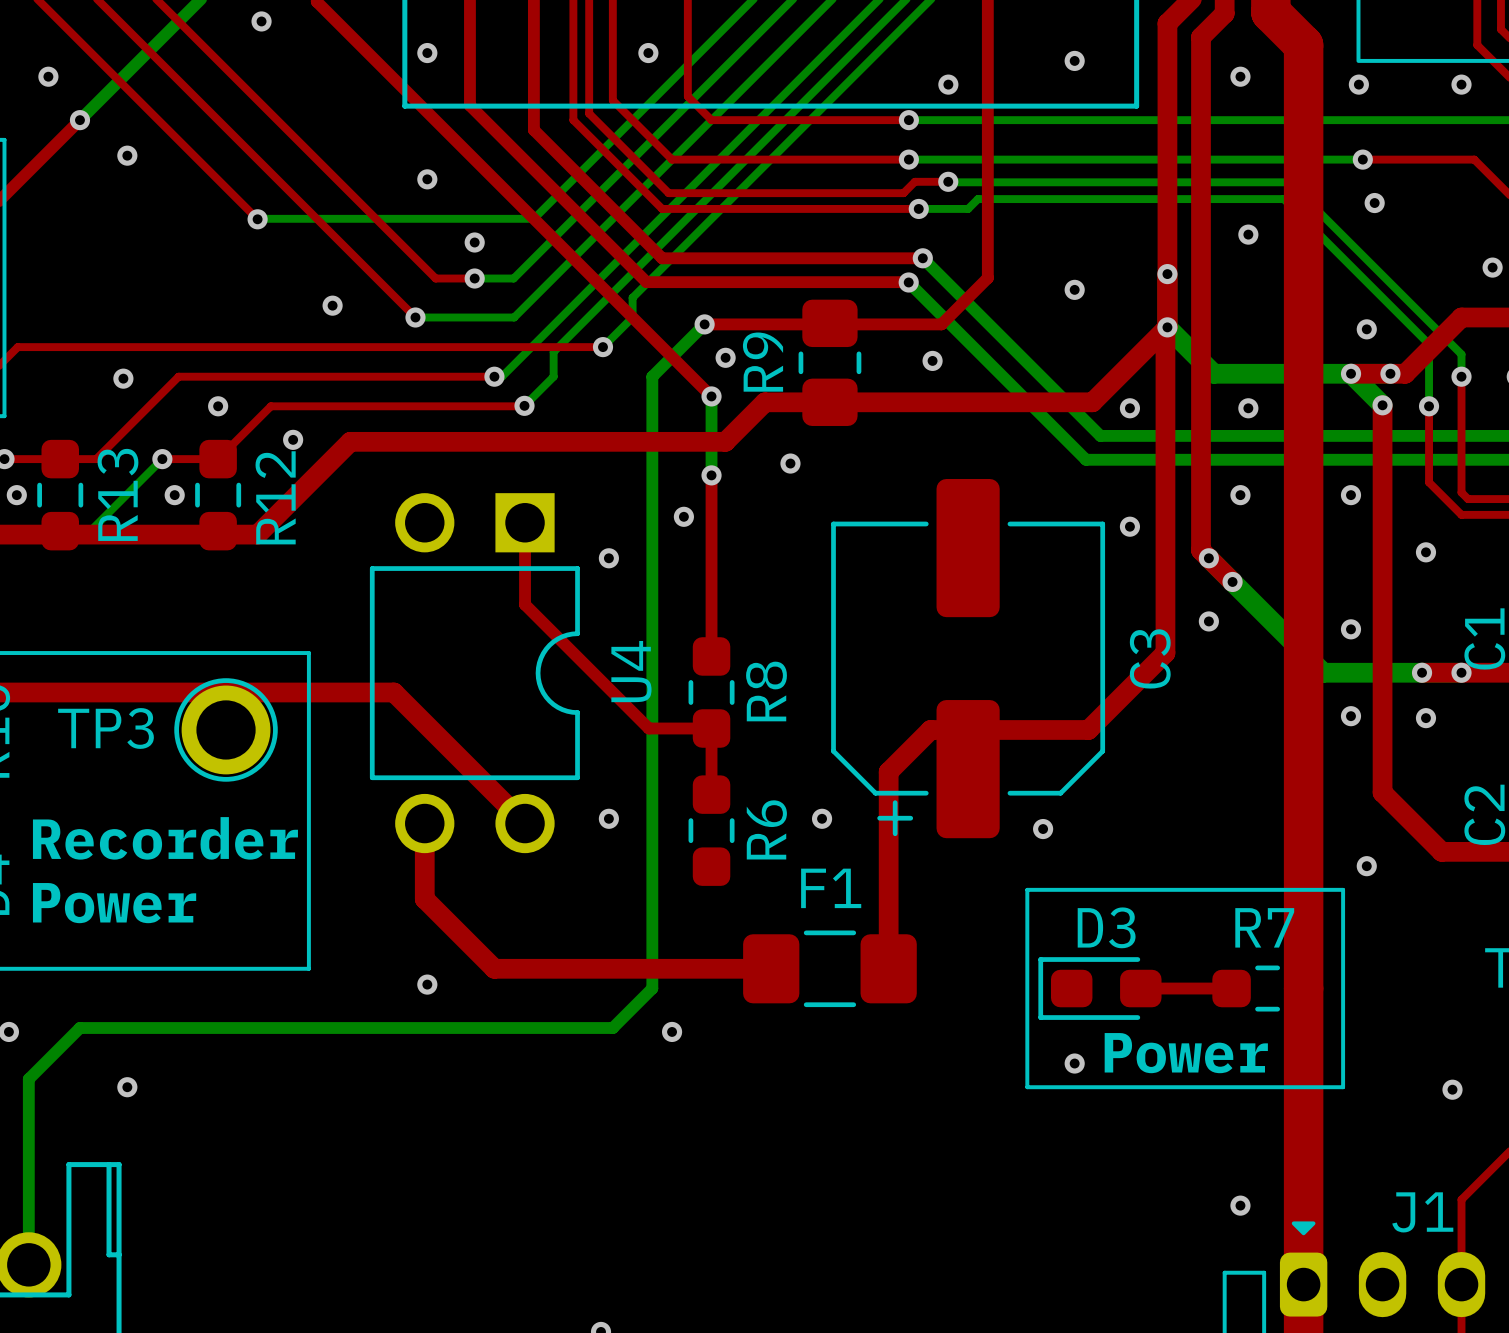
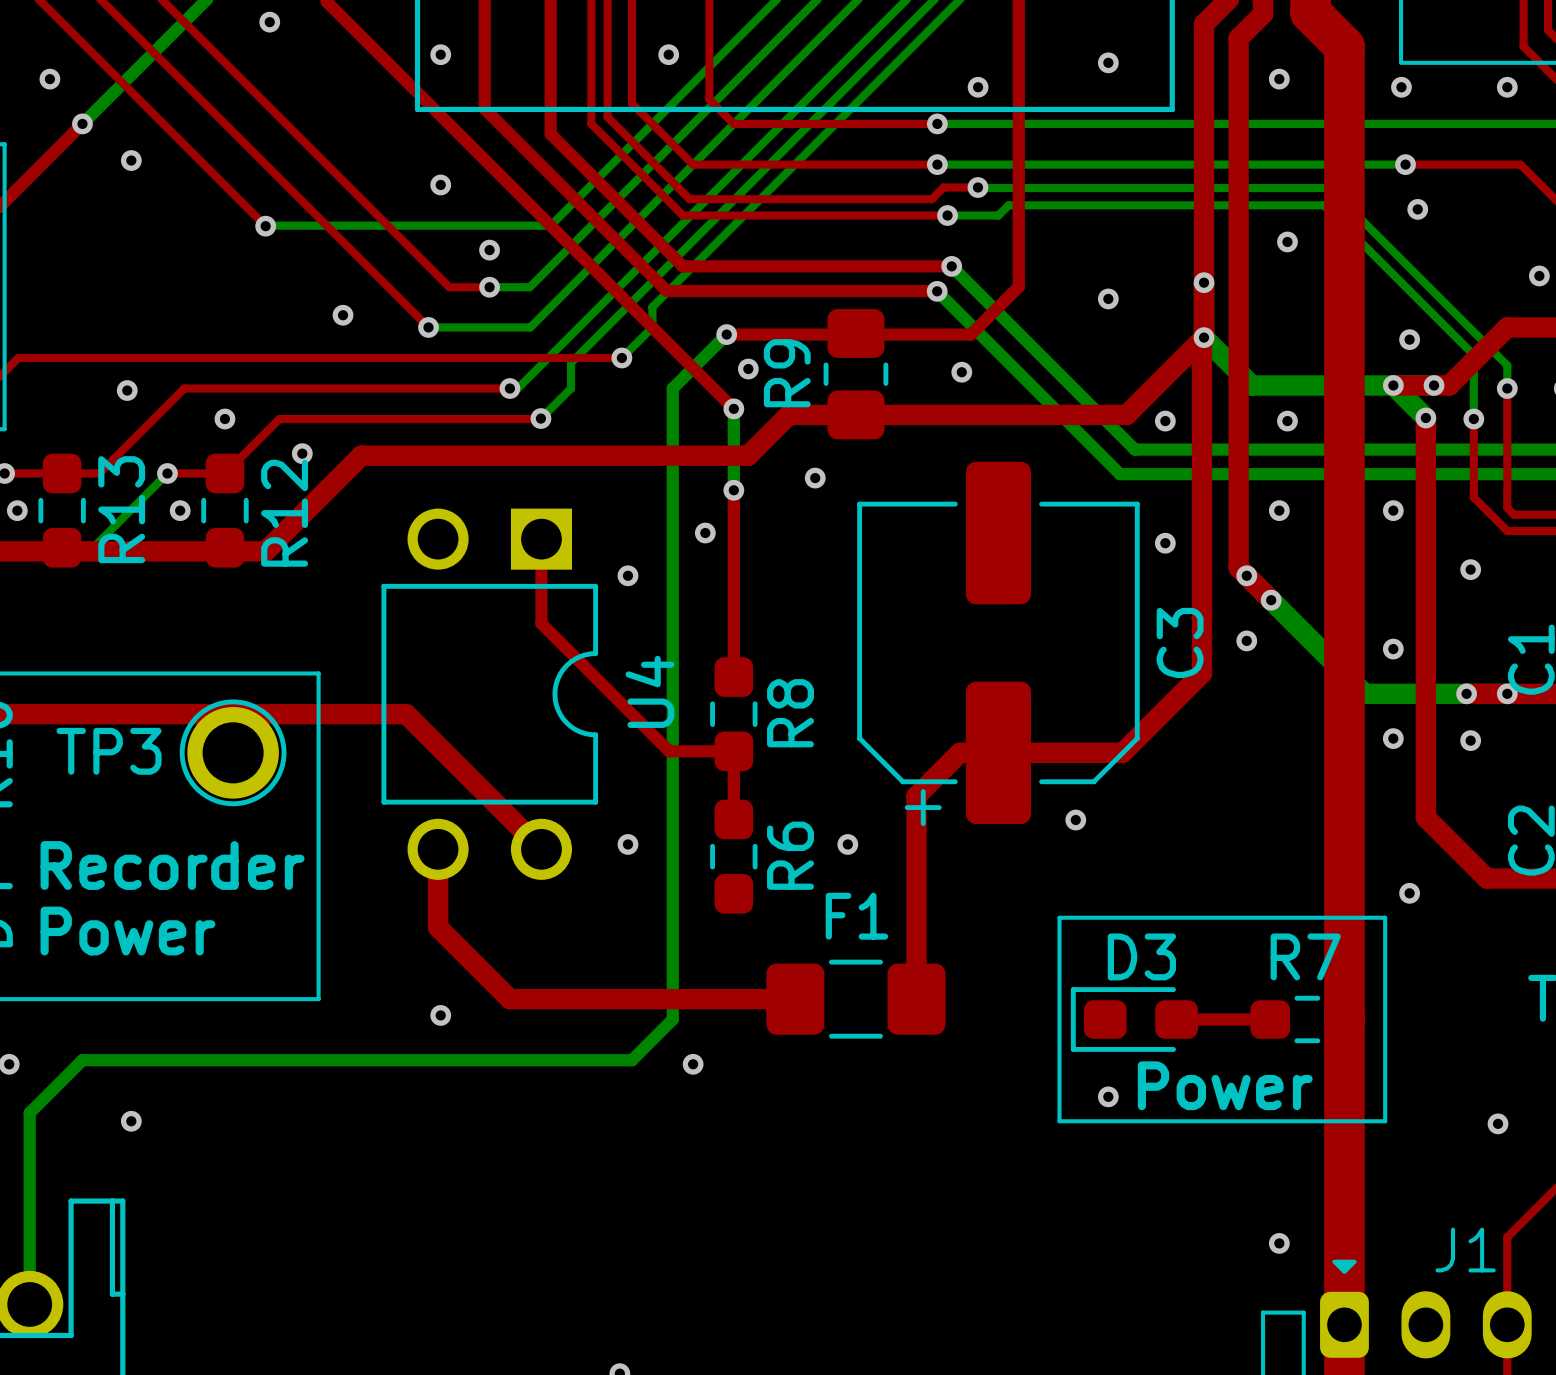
C3 footprint: [831, 478, 1106, 839] -> [857, 461, 1140, 827]
C3 name position: C3 (1150, 658) -> C3 (1180, 642)
via position: (1043, 829) -> (1075, 820)

